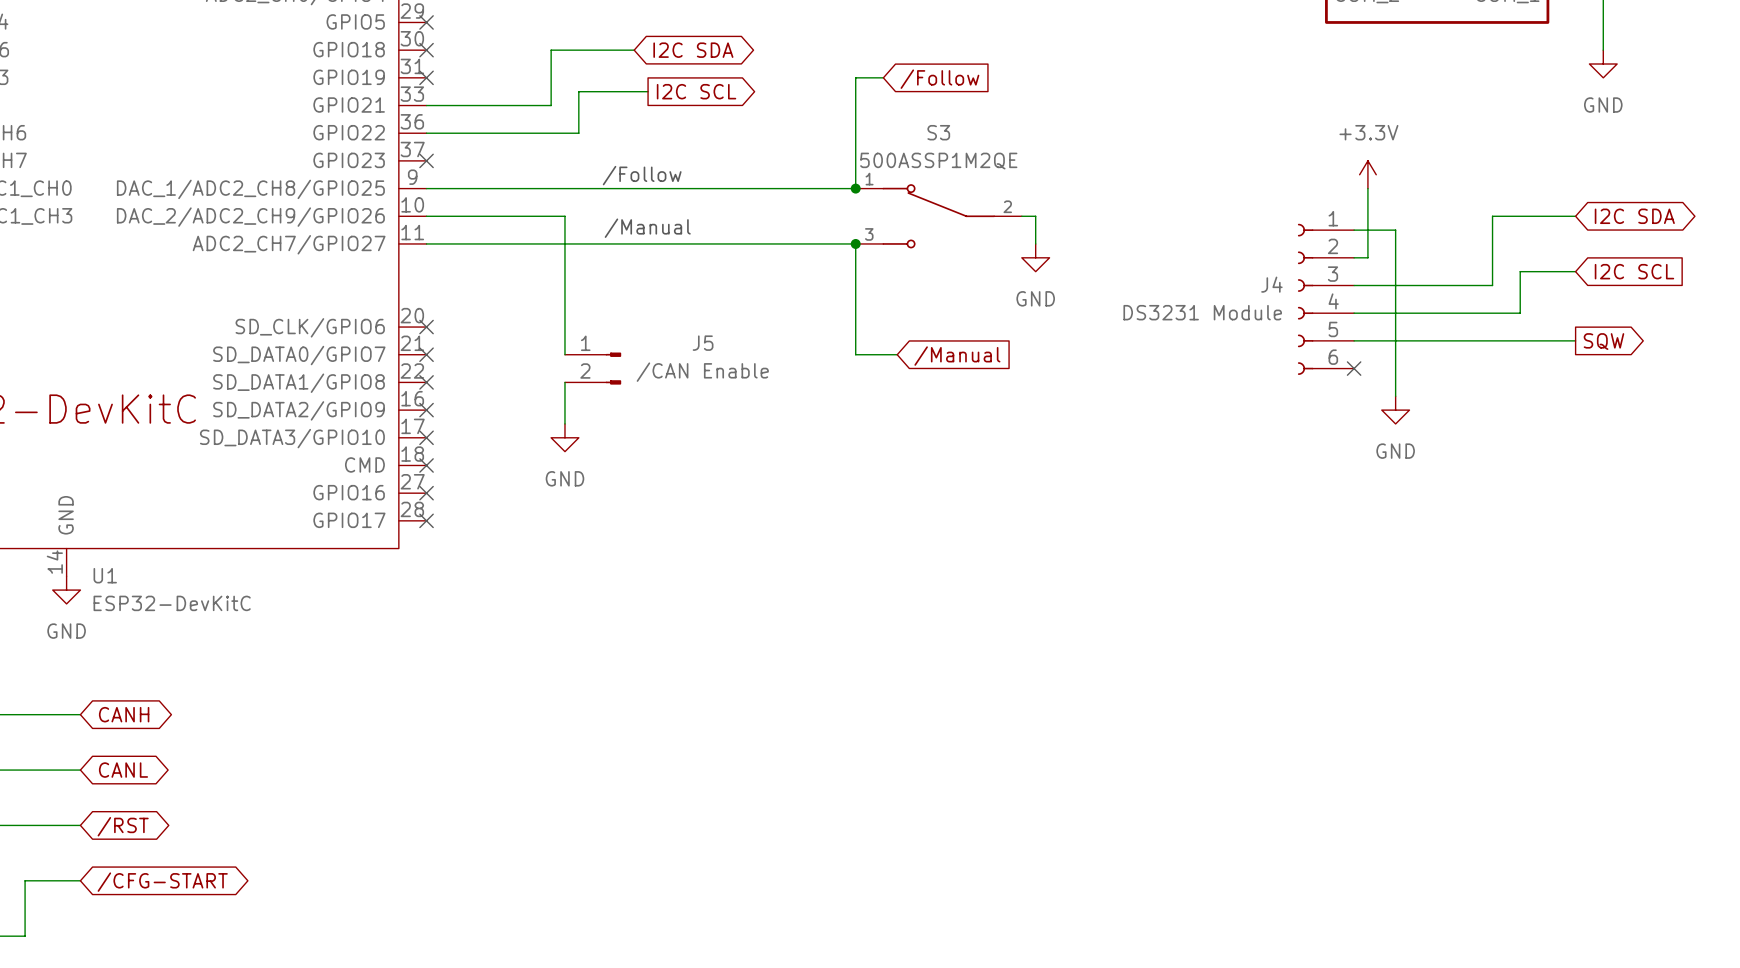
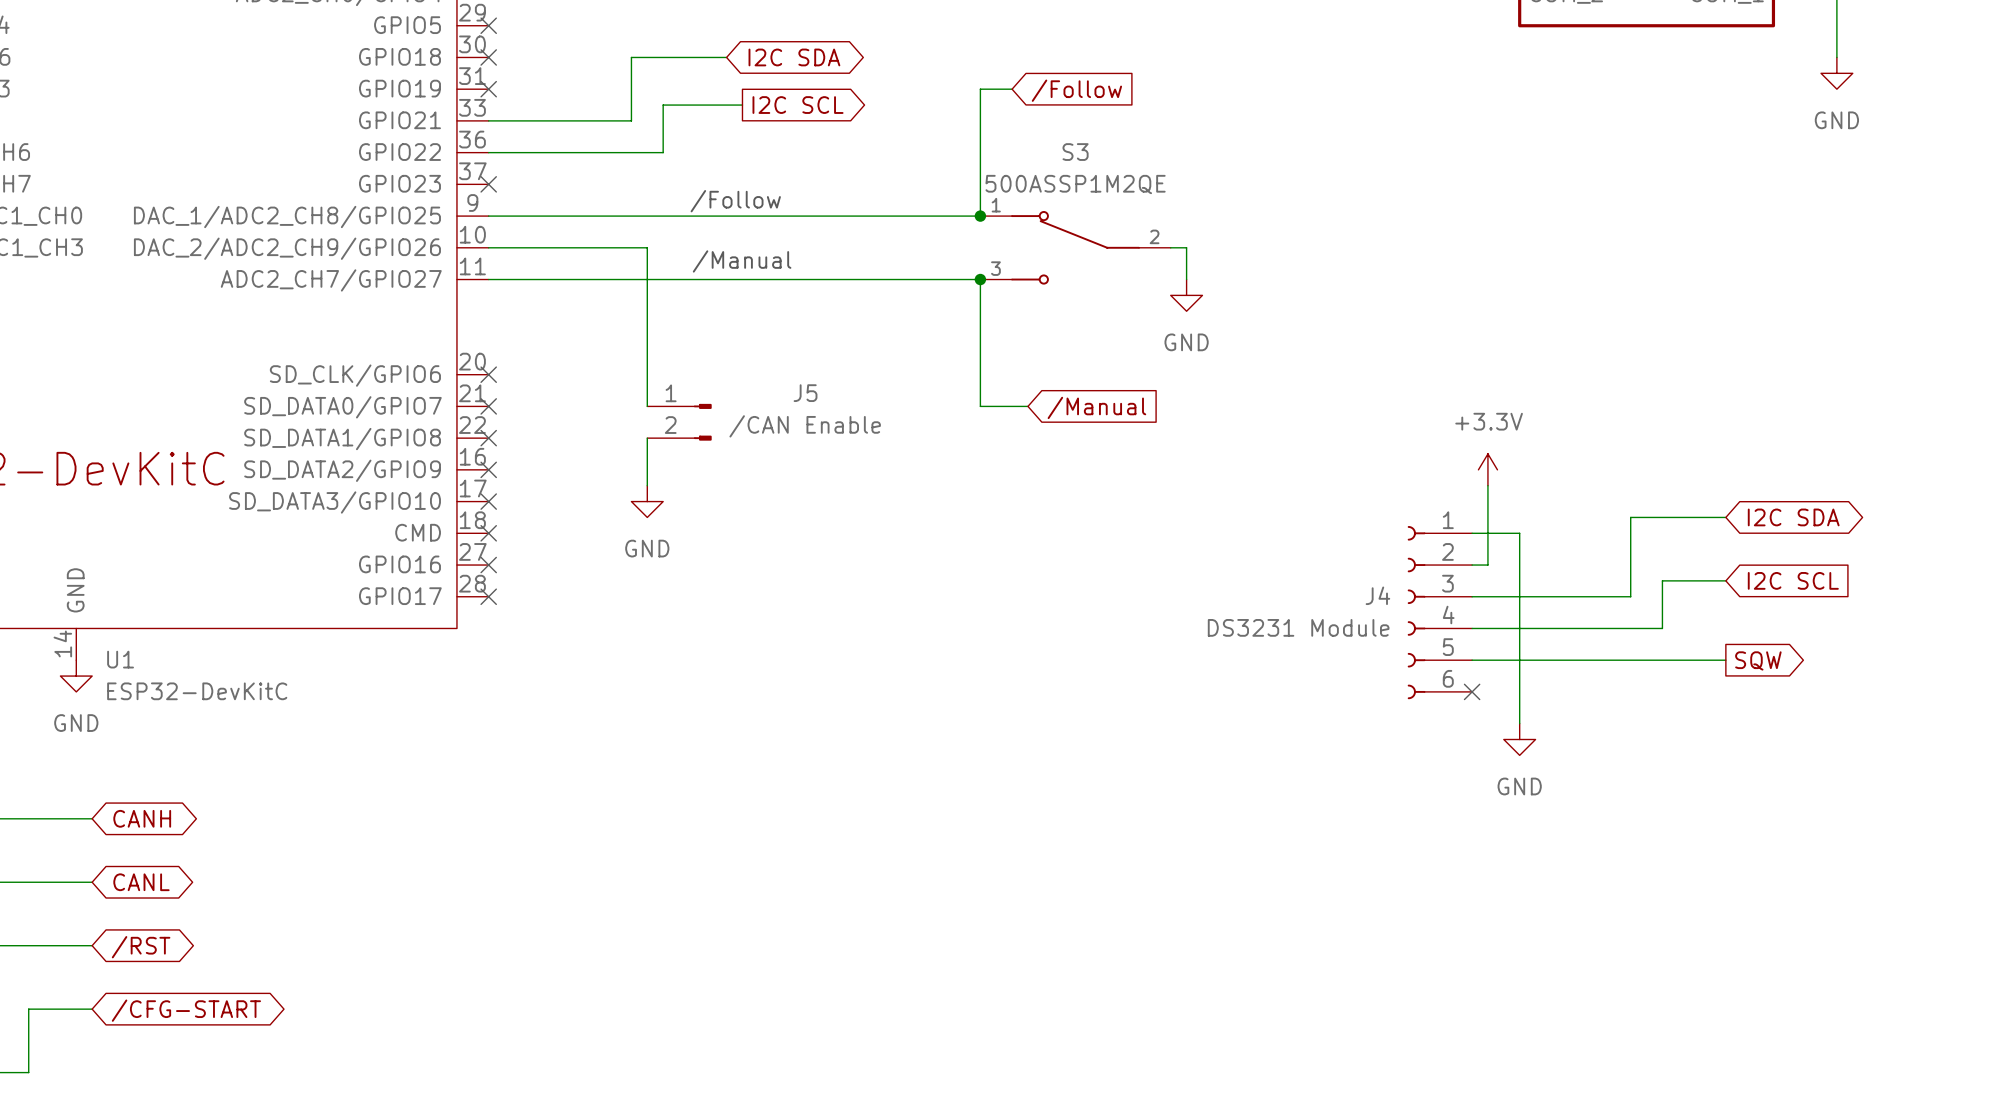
power symbol position: +3.3V (1367, 174) -> +3.3V (1487, 469)
wire: (1367, 188) (1367, 257) (1354, 257) -> (1487, 485) (1487, 565) (1472, 565)
wire: (1575, 216) (1492, 216) (1492, 285) (1354, 285) -> (1725, 517) (1630, 517) (1630, 596) (1472, 596)
global label position: I2C SDA (1634, 216) -> I2C SDA (1793, 517)
wire: (1354, 230) (1395, 230) (1395, 396) -> (1472, 533) (1519, 533) (1519, 723)
wire: (1575, 271) (1520, 271) (1520, 313) (1354, 313) -> (1725, 580) (1662, 580) (1662, 628) (1472, 628)
global label position: I2C SCL (1634, 271) -> I2C SCL (1793, 580)
J4 position: (1325, 299) -> (1439, 612)
wire: (1354, 340) (1575, 340) -> (1472, 660) (1725, 660)
global label position: SQW (1603, 341) -> SQW (1758, 660)
no-connect mark: (1354, 368) -> none
power symbol position: GND (1395, 410) -> GND (1519, 739)
no-connect mark: none -> (1472, 691)

